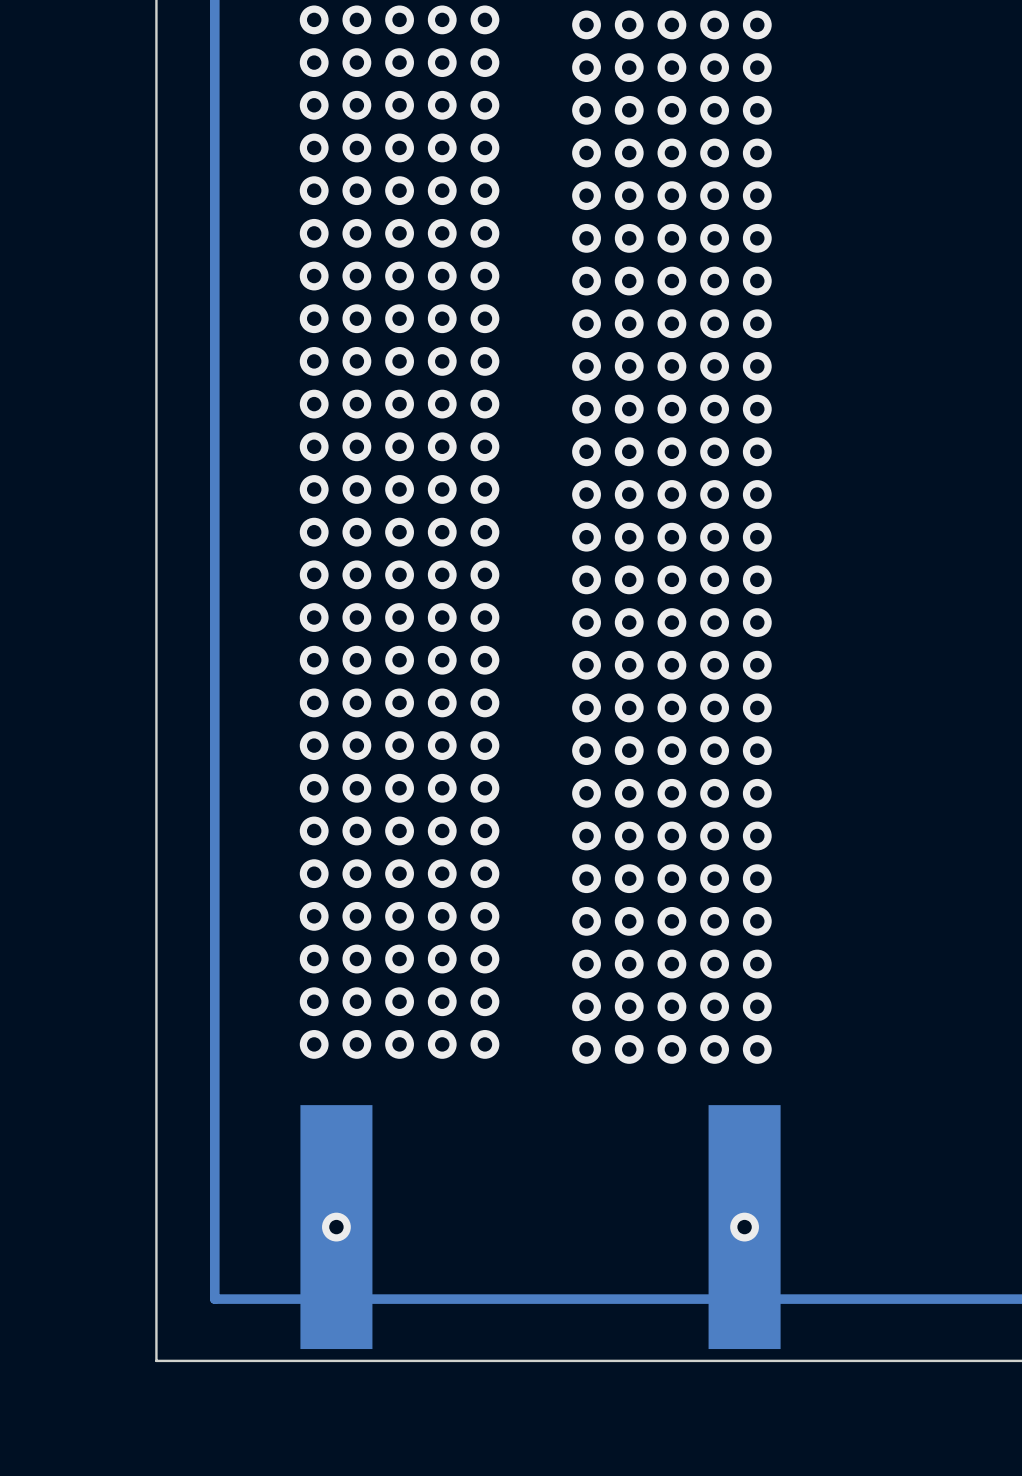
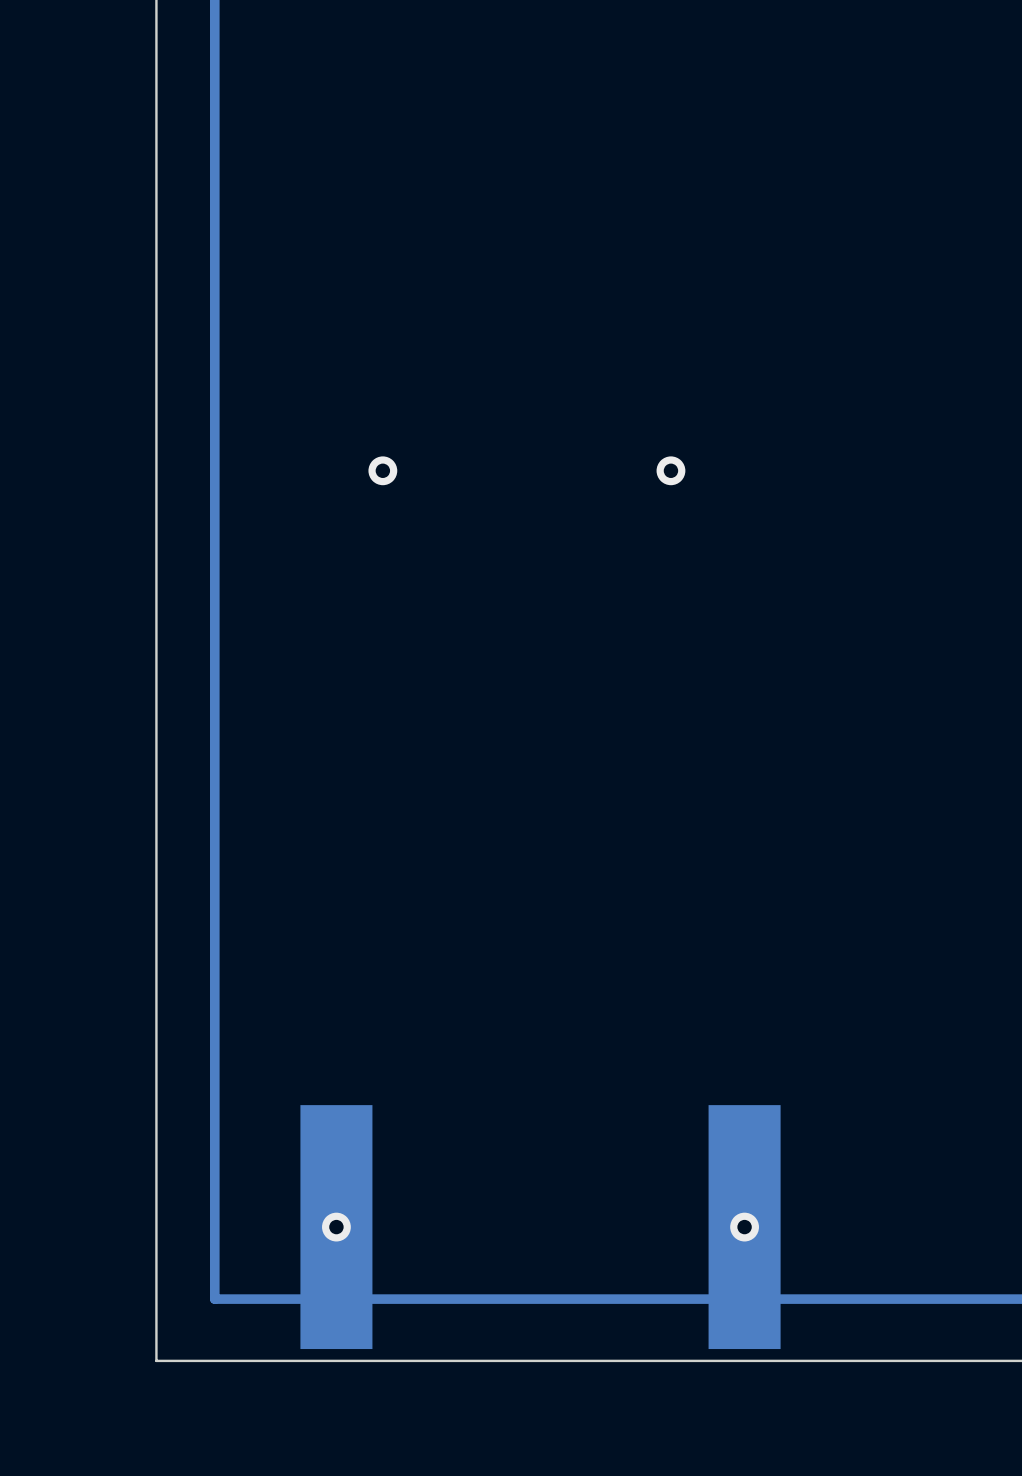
via: (314, 19) -> none
via: (356, 19) -> none
via: (399, 19) -> none
via: (442, 19) -> none
via: (484, 19) -> none
via: (586, 24) -> none
via: (629, 24) -> none
via: (671, 24) -> none
via: (714, 24) -> none
via: (757, 24) -> none
via: (314, 62) -> none
via: (356, 62) -> none
via: (399, 62) -> none
via: (442, 62) -> none
via: (484, 62) -> none
via: (586, 67) -> none
via: (629, 67) -> none
via: (671, 67) -> none
via: (714, 67) -> none
via: (757, 67) -> none
via: (314, 105) -> none
via: (356, 105) -> none
via: (399, 105) -> none
via: (442, 105) -> none
via: (484, 105) -> none
via: (586, 110) -> none
via: (629, 110) -> none
via: (671, 110) -> none
via: (714, 110) -> none
via: (757, 110) -> none
via: (314, 147) -> none
via: (356, 147) -> none
via: (399, 147) -> none
via: (442, 147) -> none
via: (484, 147) -> none
via: (586, 152) -> none
via: (629, 152) -> none
via: (671, 152) -> none
via: (714, 152) -> none
via: (757, 152) -> none
via: (314, 190) -> none
via: (356, 190) -> none
via: (399, 190) -> none
via: (442, 190) -> none
via: (484, 190) -> none
via: (586, 195) -> none
via: (629, 195) -> none
via: (671, 195) -> none
via: (714, 195) -> none
via: (757, 195) -> none
via: (314, 233) -> none
via: (356, 233) -> none
via: (399, 233) -> none
via: (442, 233) -> none
via: (484, 233) -> none
via: (586, 238) -> none
via: (629, 238) -> none
via: (671, 238) -> none
via: (714, 238) -> none
via: (757, 238) -> none
via: (314, 276) -> none
via: (356, 276) -> none
via: (399, 276) -> none
via: (442, 276) -> none
via: (484, 276) -> none
via: (586, 281) -> none
via: (629, 281) -> none
via: (671, 281) -> none
via: (714, 281) -> none
via: (757, 281) -> none
via: (314, 318) -> none
via: (356, 318) -> none
via: (399, 318) -> none
via: (442, 318) -> none
via: (484, 318) -> none
via: (586, 323) -> none
via: (629, 323) -> none
via: (671, 323) -> none
via: (714, 323) -> none
via: (757, 323) -> none
via: (314, 361) -> none
via: (356, 361) -> none
via: (399, 361) -> none
via: (442, 361) -> none
via: (484, 361) -> none
via: (586, 366) -> none
via: (629, 366) -> none
via: (671, 366) -> none
via: (714, 366) -> none
via: (757, 366) -> none
via: (314, 404) -> none
via: (356, 404) -> none
via: (399, 404) -> none
via: (442, 404) -> none
via: (484, 404) -> none
via: (586, 409) -> none
via: (629, 409) -> none
via: (671, 409) -> none
via: (714, 409) -> none
via: (757, 409) -> none
via: (314, 446) -> none
via: (356, 446) -> none
via: (399, 446) -> none
via: (442, 446) -> none
via: (484, 446) -> none
via: (586, 451) -> none
via: (629, 451) -> none
via: (671, 451) -> none
via: (714, 451) -> none
via: (757, 451) -> none
via: none -> (382, 470)
via: none -> (670, 470)
via: (314, 489) -> none
via: (356, 489) -> none
via: (399, 489) -> none
via: (442, 489) -> none
via: (484, 489) -> none
via: (586, 494) -> none
via: (629, 494) -> none
via: (671, 494) -> none
via: (714, 494) -> none
via: (757, 494) -> none
via: (314, 532) -> none
via: (356, 532) -> none
via: (399, 532) -> none
via: (442, 532) -> none
via: (484, 532) -> none
via: (586, 537) -> none
via: (629, 537) -> none
via: (671, 537) -> none
via: (714, 537) -> none
via: (757, 537) -> none
via: (314, 574) -> none
via: (356, 574) -> none
via: (399, 574) -> none
via: (442, 574) -> none
via: (484, 574) -> none
via: (586, 579) -> none
via: (629, 579) -> none
via: (671, 579) -> none
via: (714, 579) -> none
via: (757, 579) -> none
via: (314, 617) -> none
via: (356, 617) -> none
via: (399, 617) -> none
via: (442, 617) -> none
via: (484, 617) -> none
via: (586, 622) -> none
via: (629, 622) -> none
via: (671, 622) -> none
via: (714, 622) -> none
via: (757, 622) -> none
via: (314, 660) -> none
via: (356, 660) -> none
via: (399, 660) -> none
via: (442, 660) -> none
via: (484, 660) -> none
via: (586, 665) -> none
via: (629, 665) -> none
via: (671, 665) -> none
via: (714, 665) -> none
via: (757, 665) -> none
via: (314, 702) -> none
via: (356, 702) -> none
via: (399, 702) -> none
via: (442, 702) -> none
via: (484, 702) -> none
via: (586, 707) -> none
via: (629, 707) -> none
via: (671, 707) -> none
via: (714, 707) -> none
via: (757, 707) -> none
via: (314, 745) -> none
via: (356, 745) -> none
via: (399, 745) -> none
via: (442, 745) -> none
via: (484, 745) -> none
via: (586, 750) -> none
via: (629, 750) -> none
via: (671, 750) -> none
via: (714, 750) -> none
via: (757, 750) -> none
via: (314, 788) -> none
via: (356, 788) -> none
via: (399, 788) -> none
via: (442, 788) -> none
via: (484, 788) -> none
via: (586, 793) -> none
via: (629, 793) -> none
via: (671, 793) -> none
via: (714, 793) -> none
via: (757, 793) -> none
via: (314, 830) -> none
via: (356, 830) -> none
via: (399, 830) -> none
via: (442, 830) -> none
via: (484, 830) -> none
via: (586, 835) -> none
via: (629, 835) -> none
via: (671, 835) -> none
via: (714, 835) -> none
via: (757, 835) -> none
via: (314, 873) -> none
via: (356, 873) -> none
via: (399, 873) -> none
via: (442, 873) -> none
via: (484, 873) -> none
via: (586, 878) -> none
via: (629, 878) -> none
via: (671, 878) -> none
via: (714, 878) -> none
via: (757, 878) -> none
via: (314, 916) -> none
via: (356, 916) -> none
via: (399, 916) -> none
via: (442, 916) -> none
via: (484, 916) -> none
via: (586, 921) -> none
via: (629, 921) -> none
via: (671, 921) -> none
via: (714, 921) -> none
via: (757, 921) -> none
via: (314, 959) -> none
via: (356, 959) -> none
via: (399, 959) -> none
via: (442, 959) -> none
via: (484, 959) -> none
via: (586, 964) -> none
via: (629, 964) -> none
via: (671, 964) -> none
via: (714, 964) -> none
via: (757, 964) -> none
via: (314, 1001) -> none
via: (356, 1001) -> none
via: (399, 1001) -> none
via: (442, 1001) -> none
via: (484, 1001) -> none
via: (586, 1006) -> none
via: (629, 1006) -> none
via: (671, 1006) -> none
via: (714, 1006) -> none
via: (757, 1006) -> none
via: (314, 1044) -> none
via: (356, 1044) -> none
via: (399, 1044) -> none
via: (442, 1044) -> none
via: (484, 1044) -> none
via: (586, 1049) -> none
via: (629, 1049) -> none
via: (671, 1049) -> none
via: (714, 1049) -> none
via: (757, 1049) -> none

